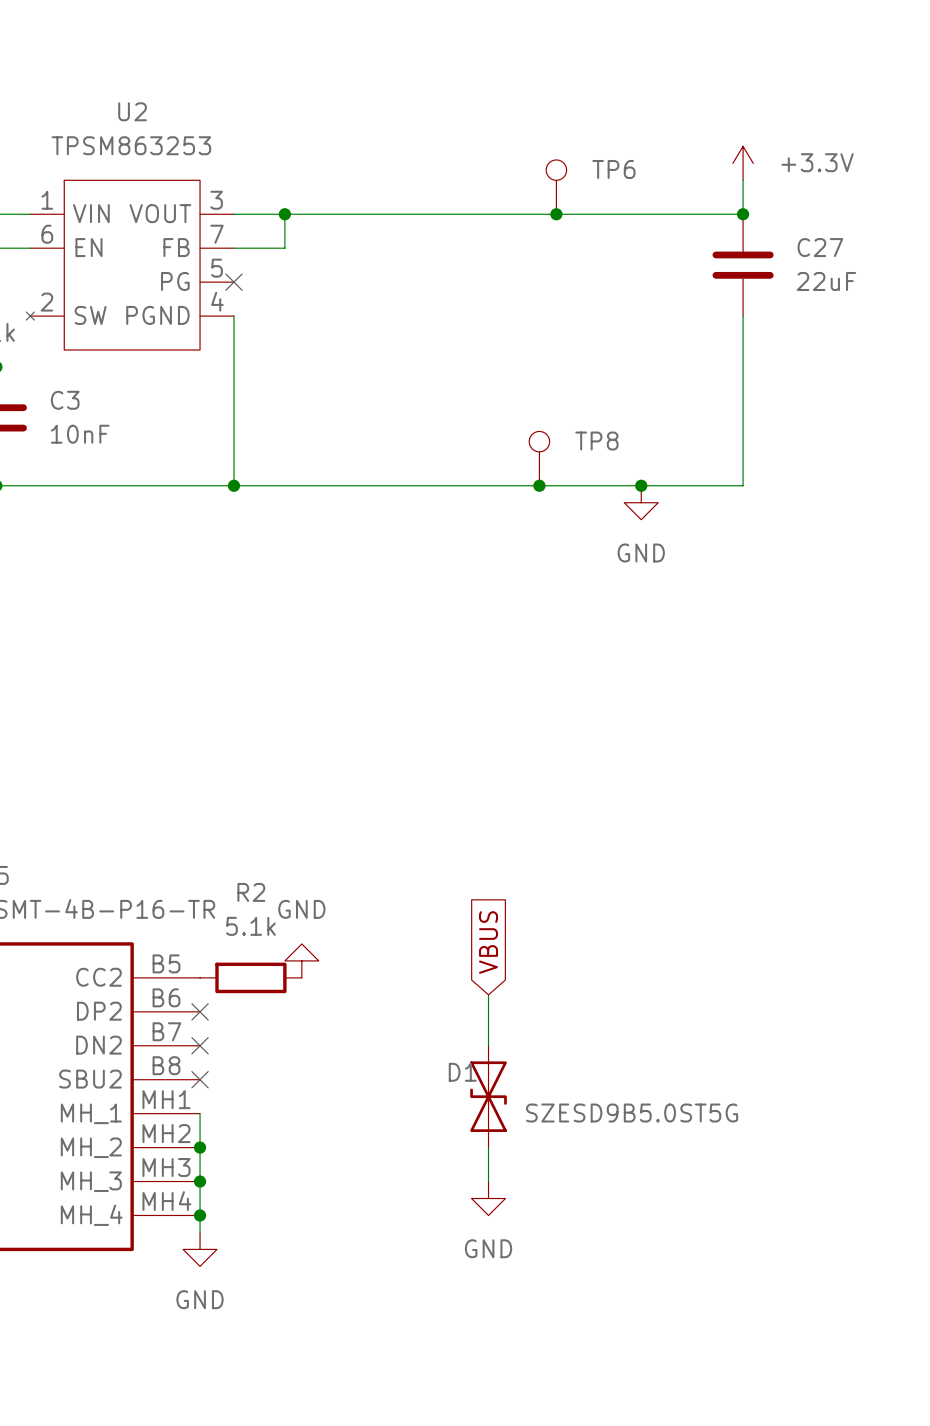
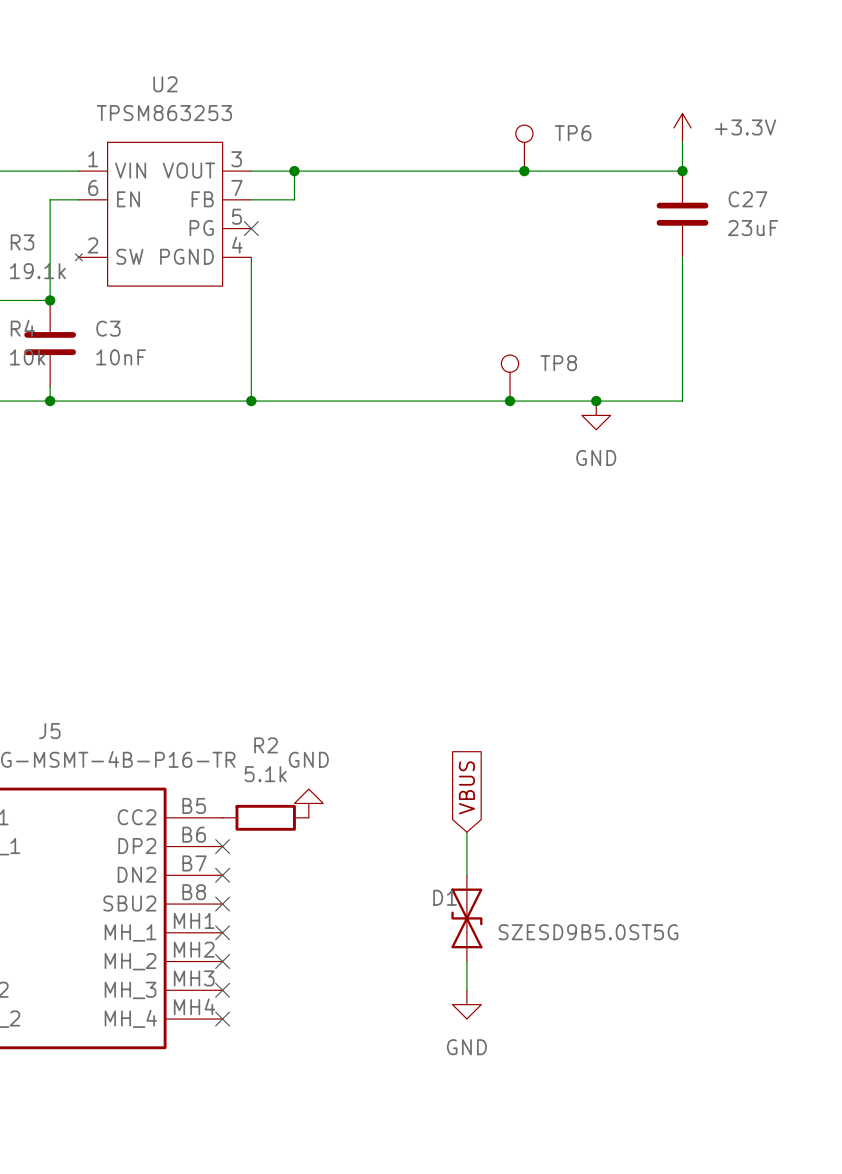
C27 value: 22uF (826, 281) -> 23uF (753, 228)
wire: (200, 1113) (200, 1232) -> none
no-connect mark: none -> (222, 932)
junction: (200, 1147) -> none
no-connect mark: none -> (222, 961)
junction: (200, 1181) -> none
no-connect mark: none -> (222, 990)
junction: (200, 1215) -> none
no-connect mark: none -> (222, 1019)
power symbol: GND (200, 1249) -> none

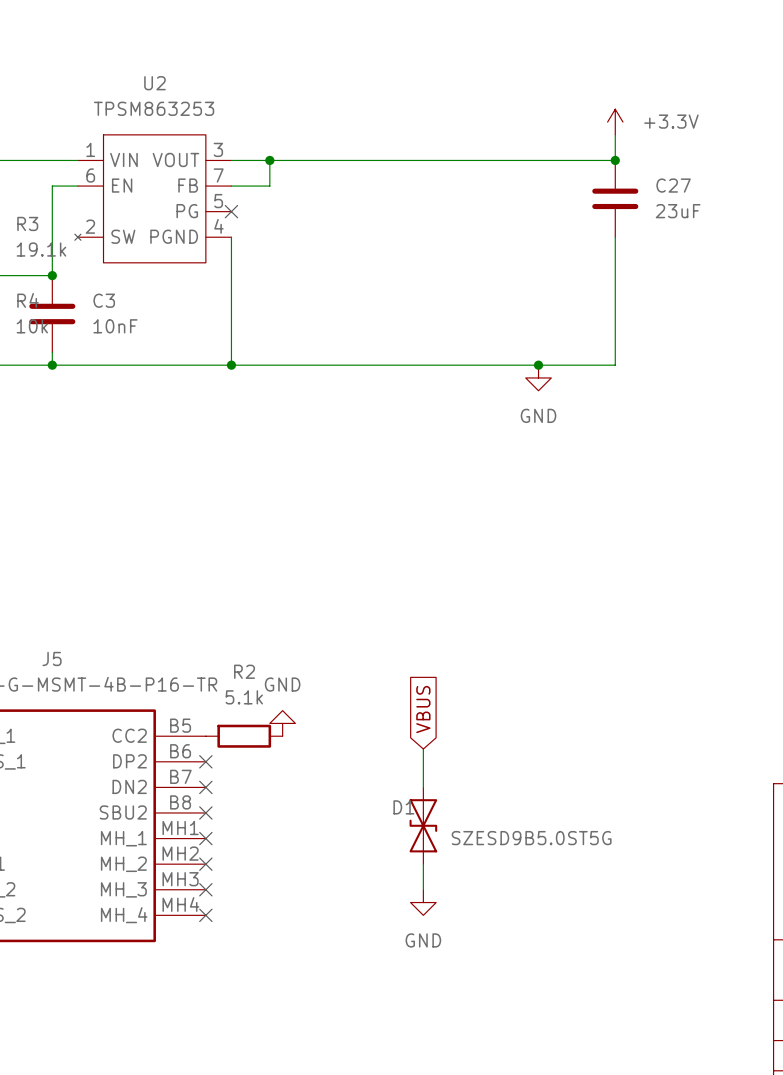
TP6: (524, 148) -> none
junction: (524, 171) -> none
TP8: (510, 378) -> none
junction: (510, 401) -> none

